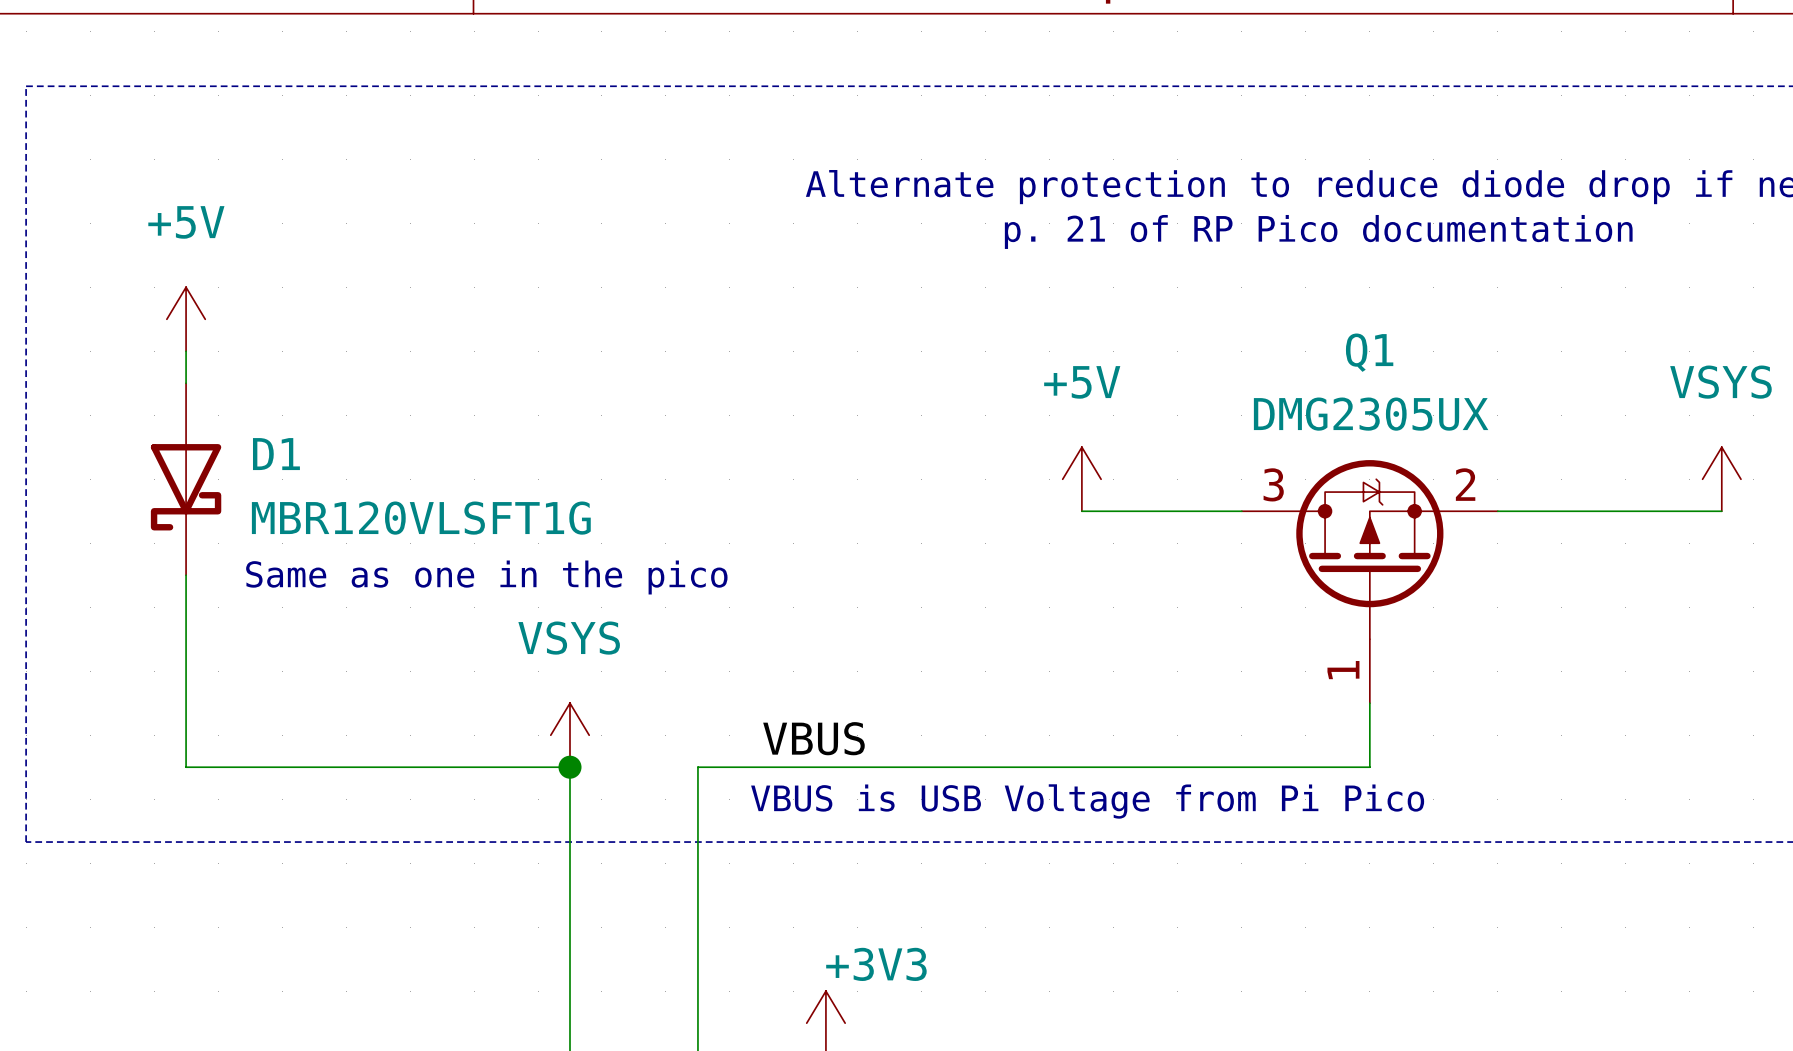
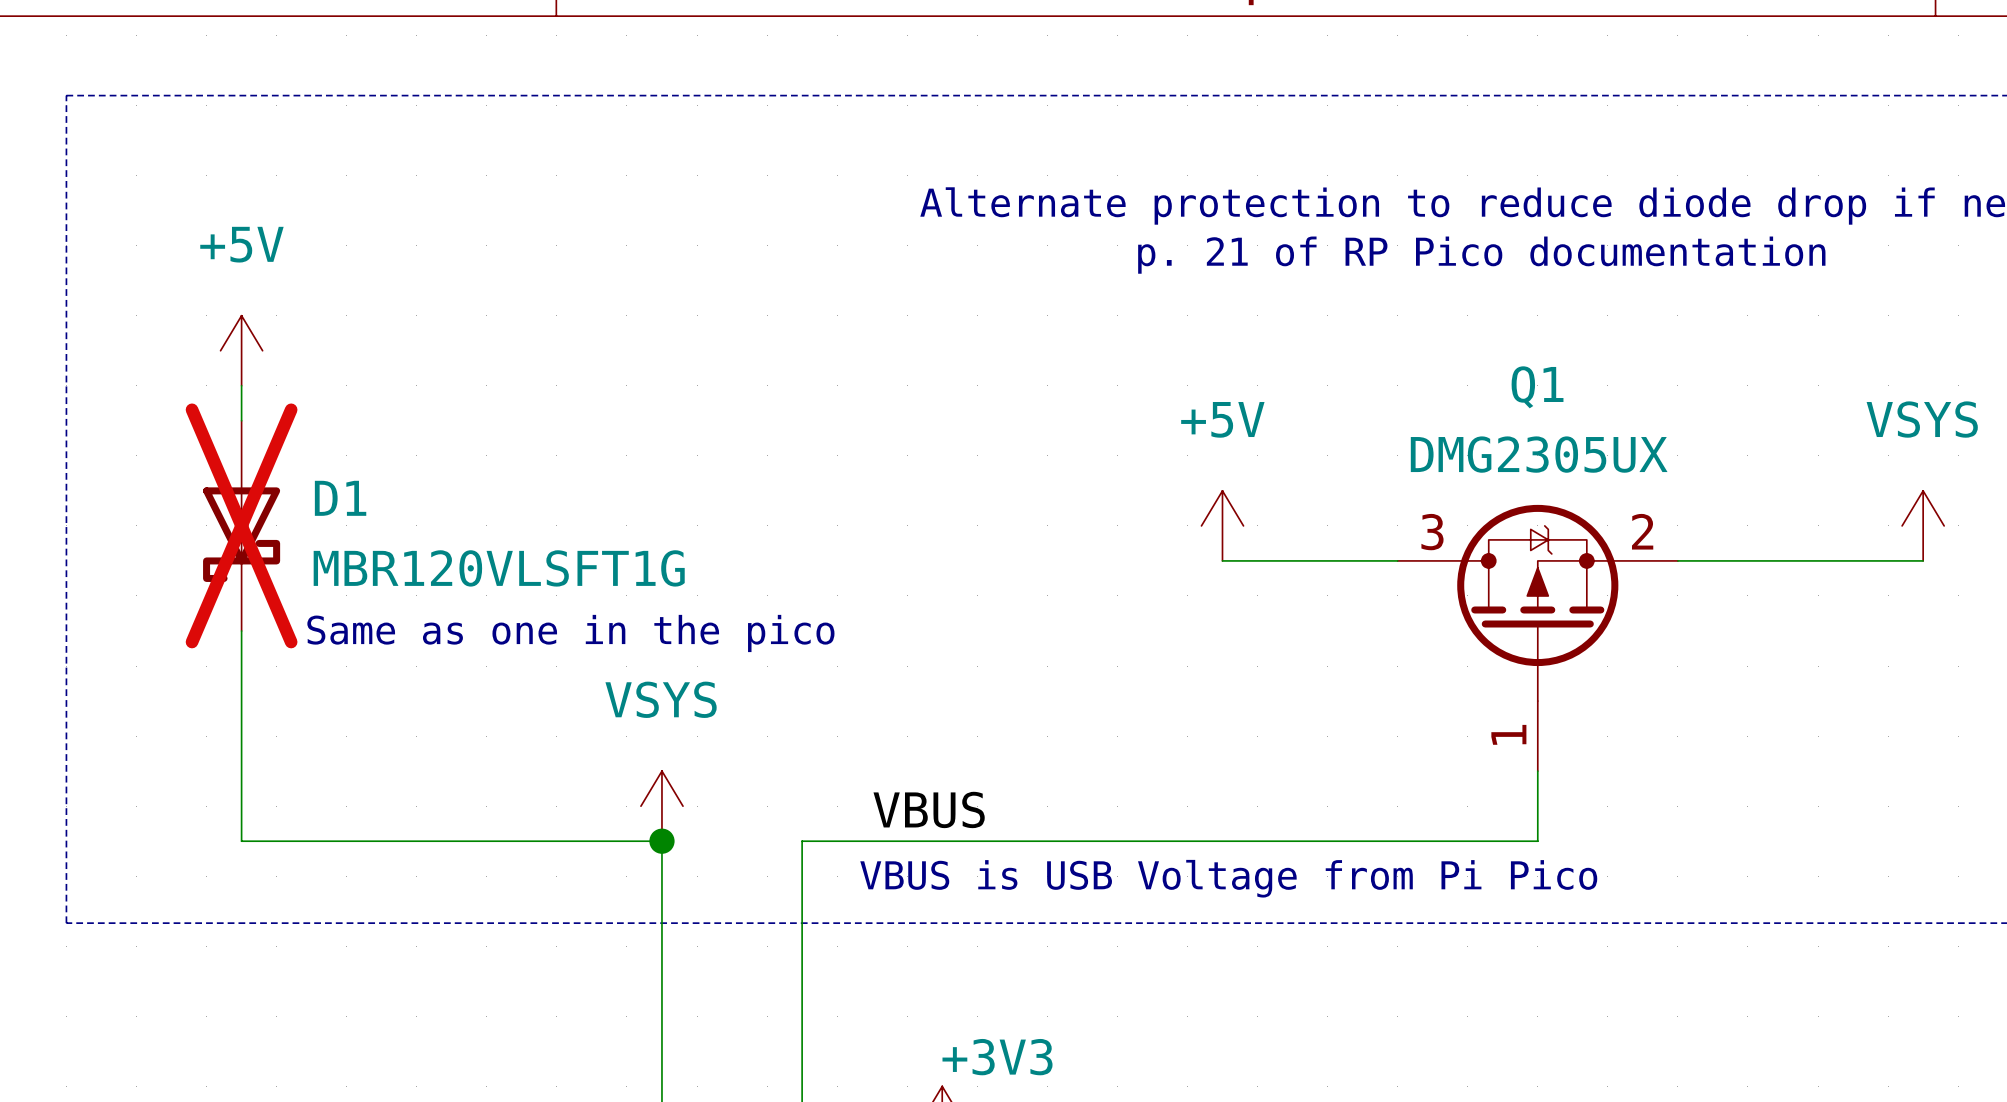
D1 do-not-place cross: none -> (241, 525)

